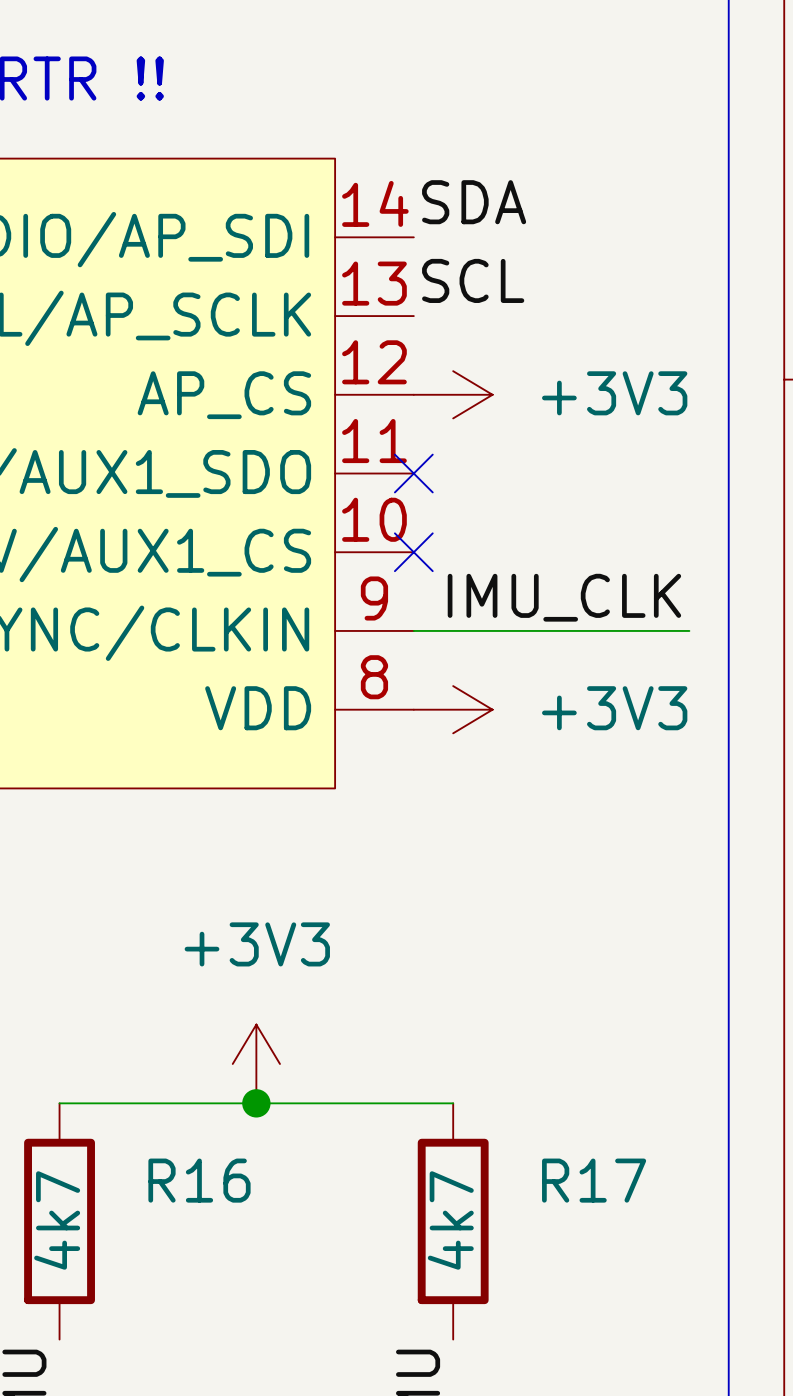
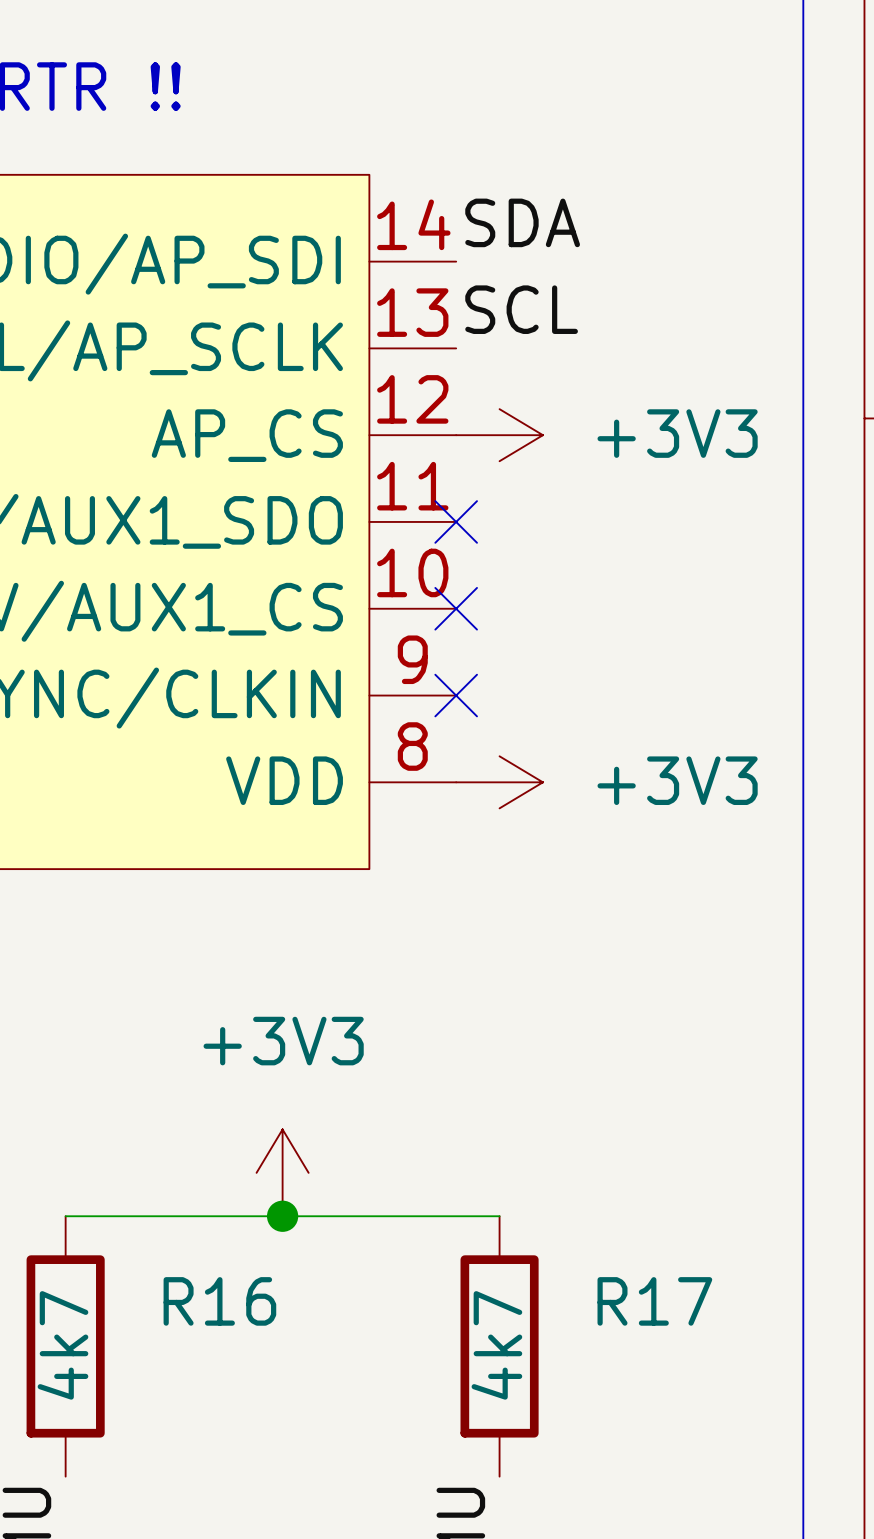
label: IMU_CLK (564, 597) -> none
wire: (413, 630) (689, 630) -> none
no-connect mark: none -> (456, 695)

